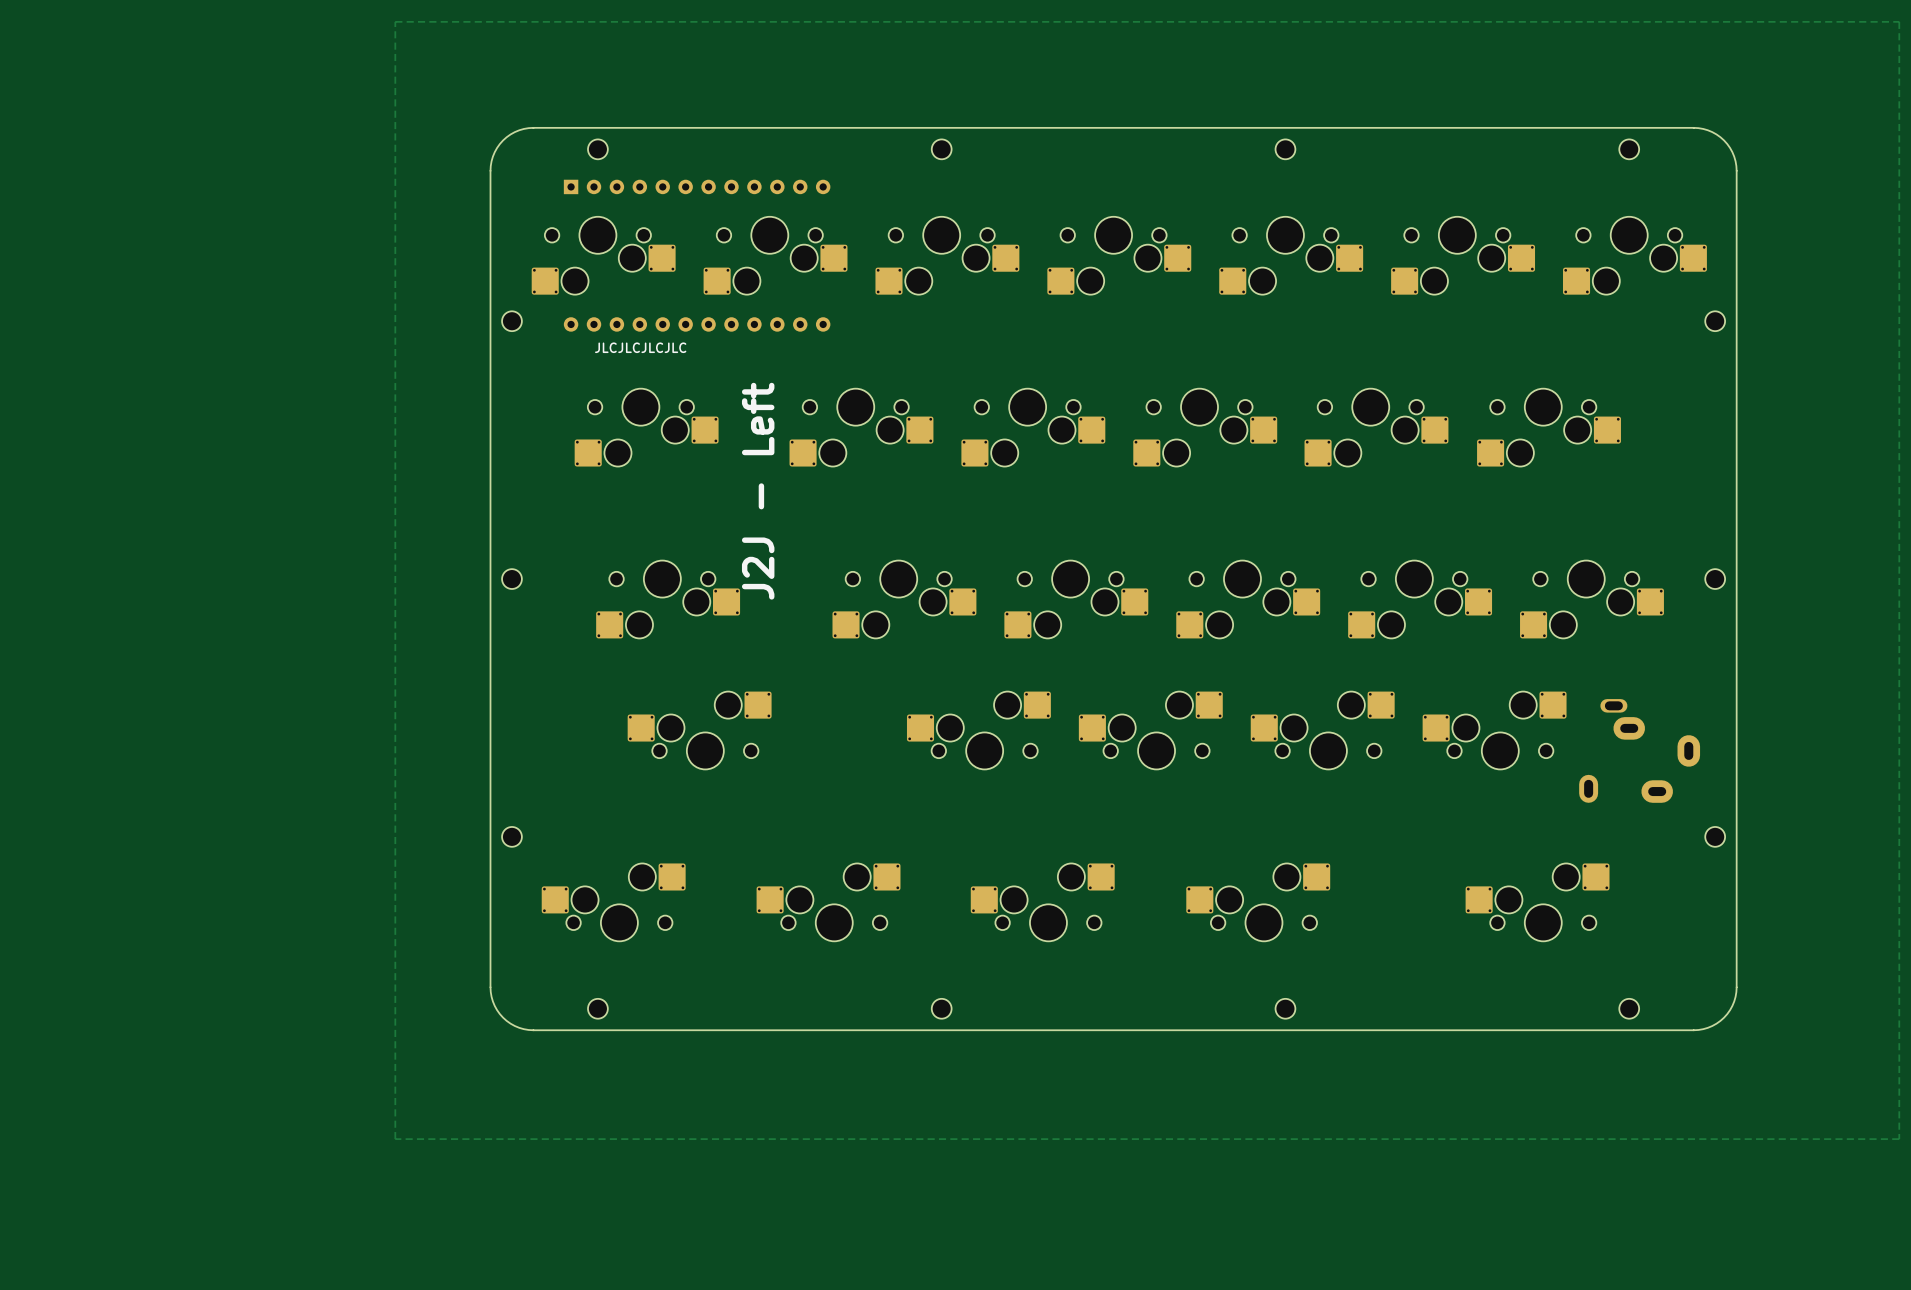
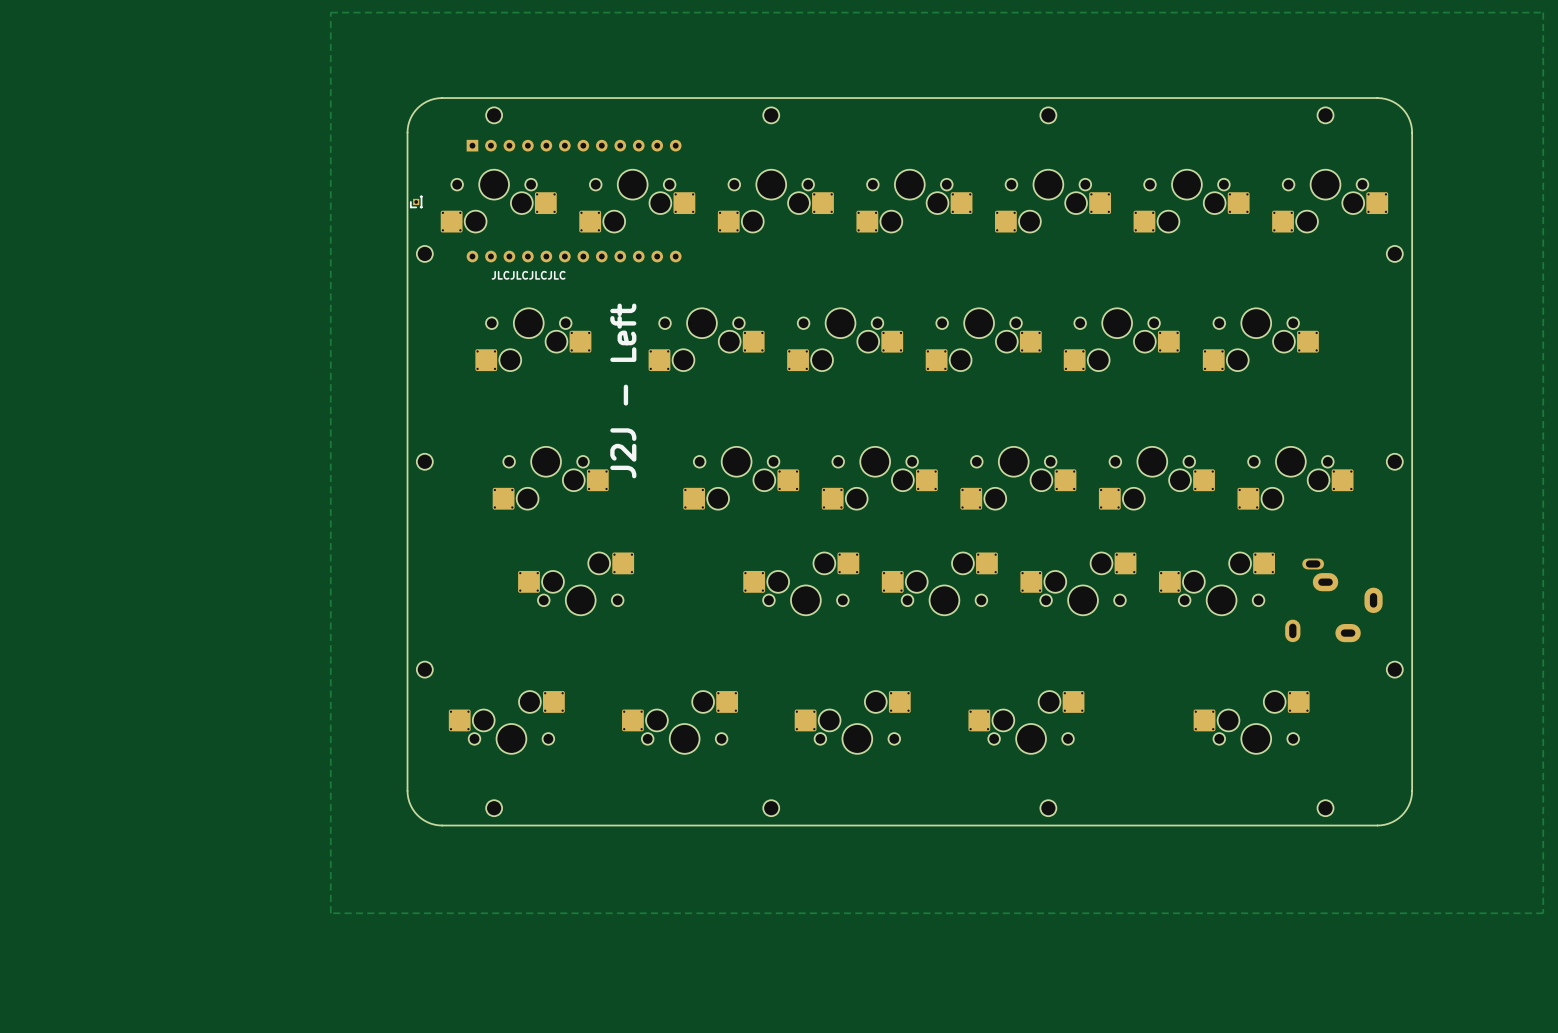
part: none -> (416, 201)

